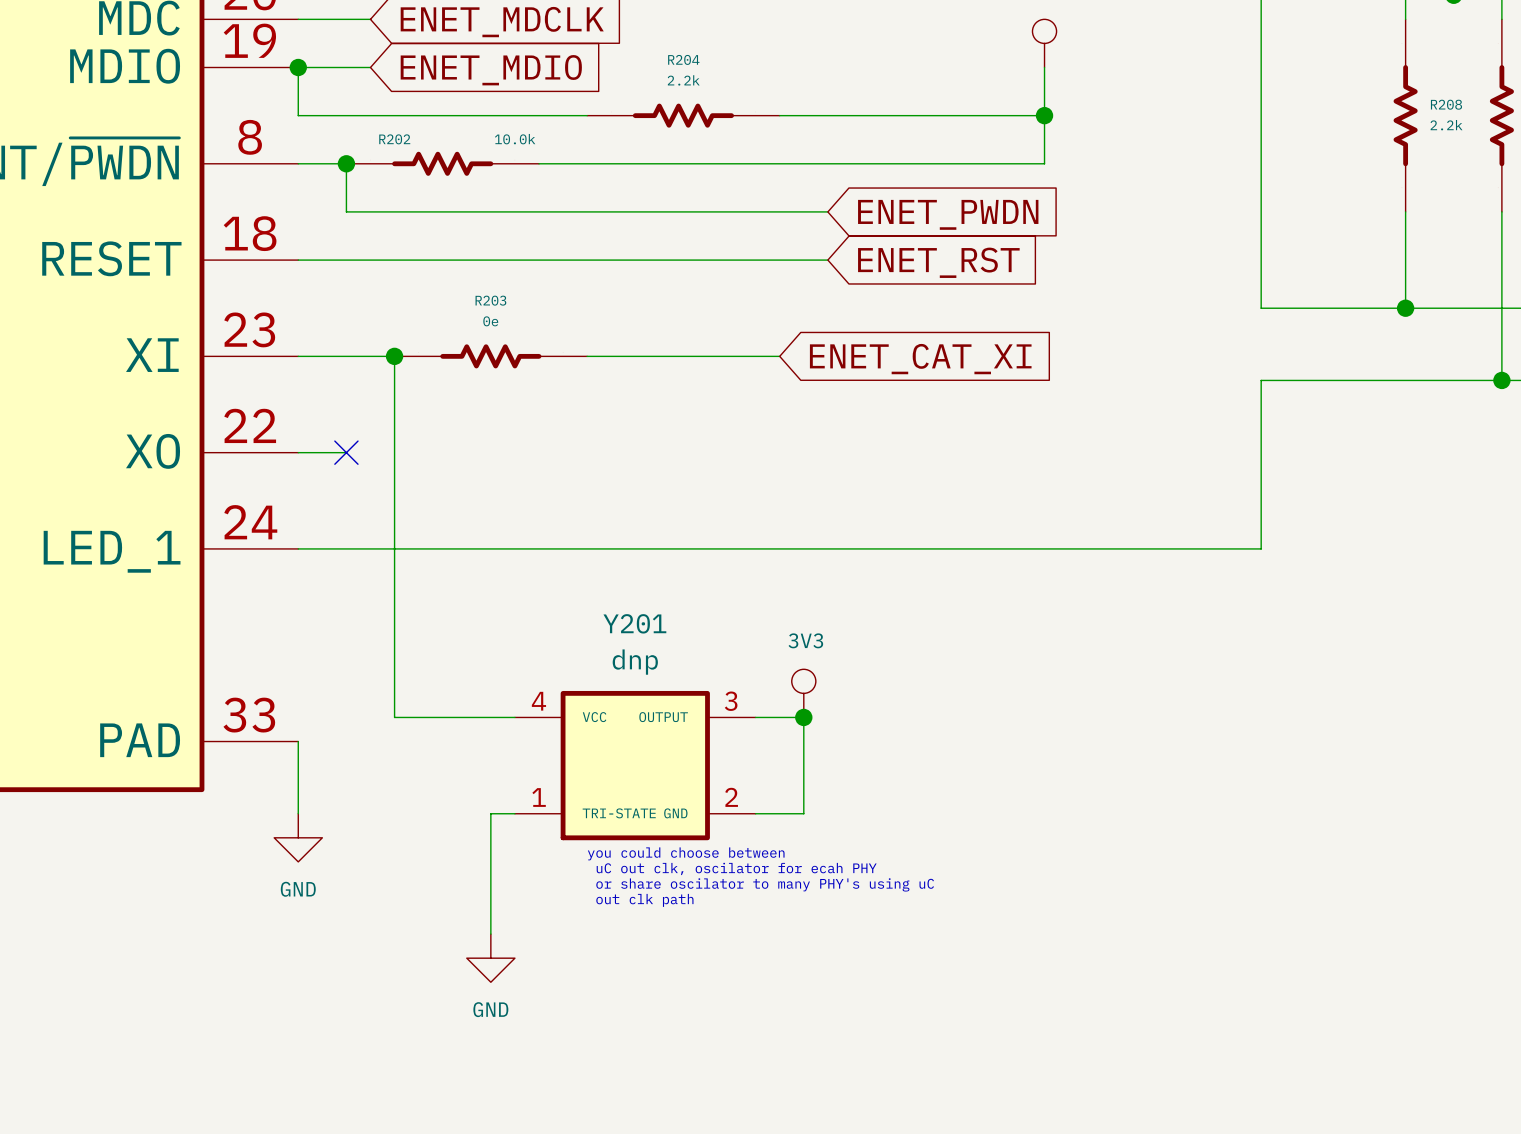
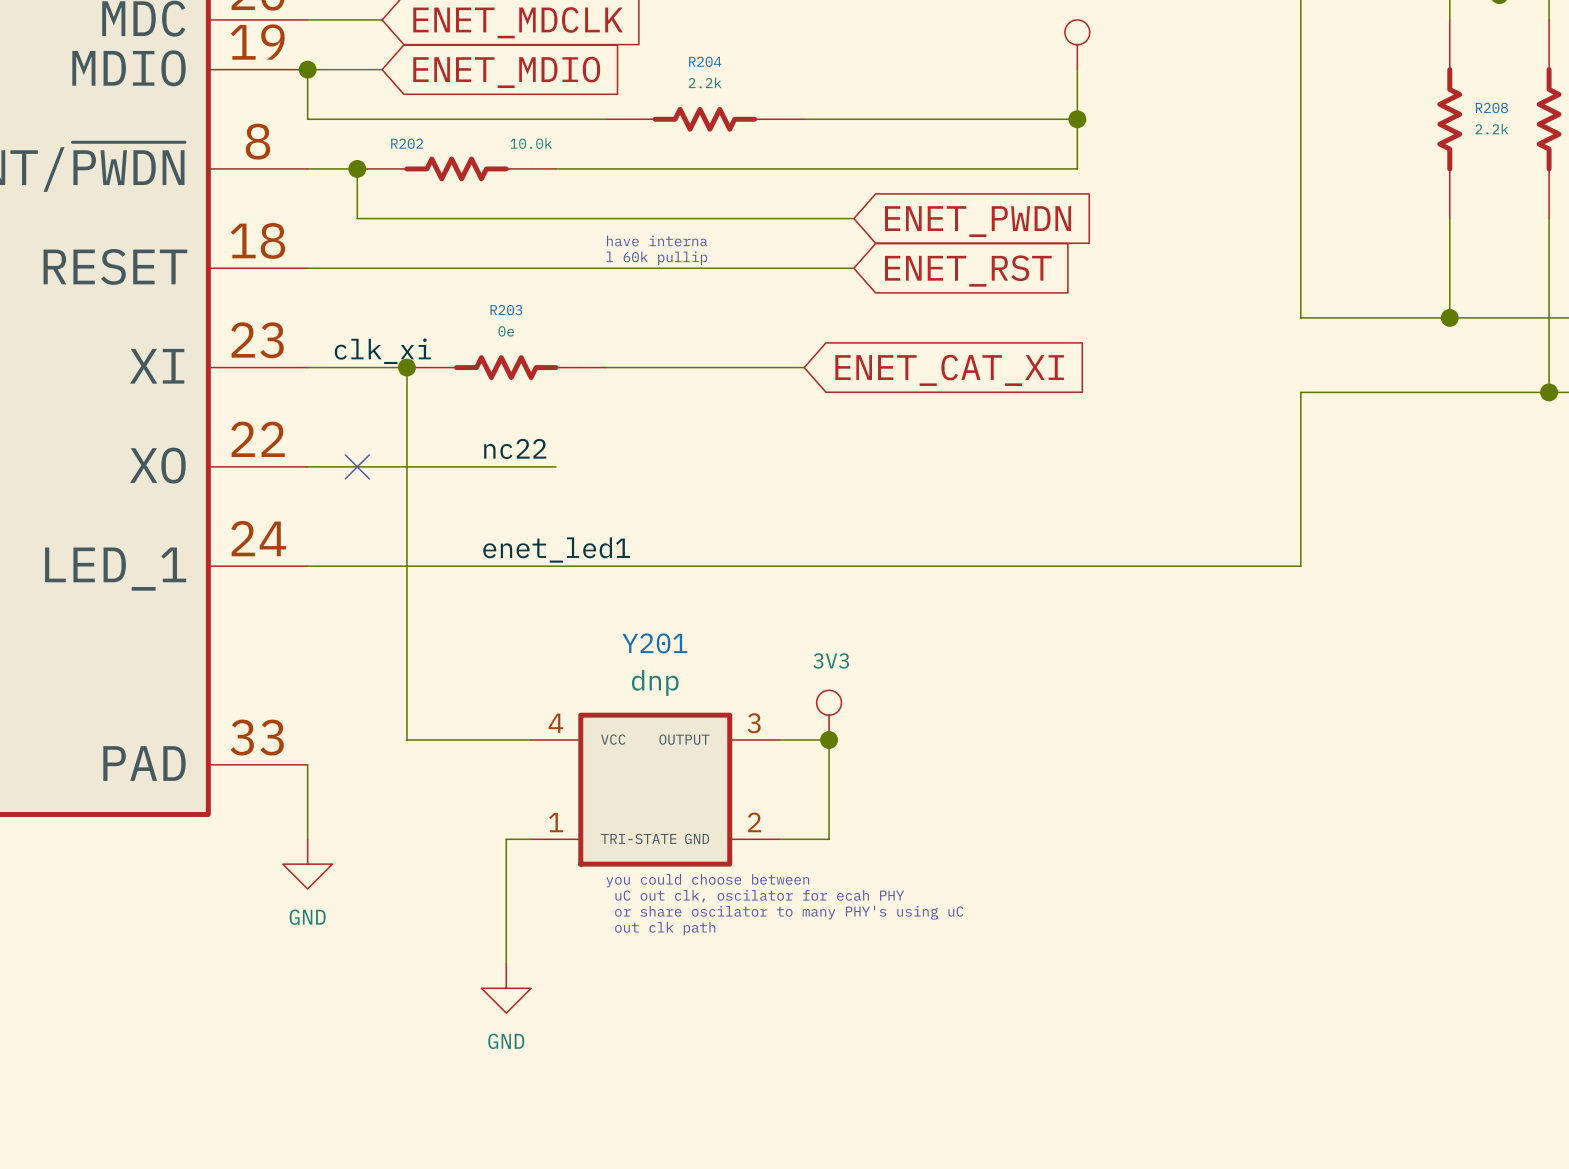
text: none -> have interna (657, 240)
text: none -> l 60k pullip (656, 258)
label: none -> clk_xi (382, 351)
label: none -> nc22 (515, 448)
wire: none -> (357, 466) (555, 466)
label: none -> enet_led1 (556, 550)

